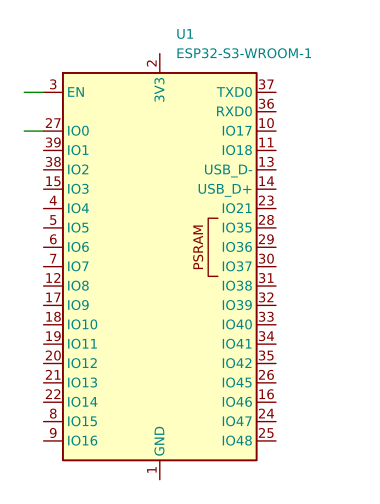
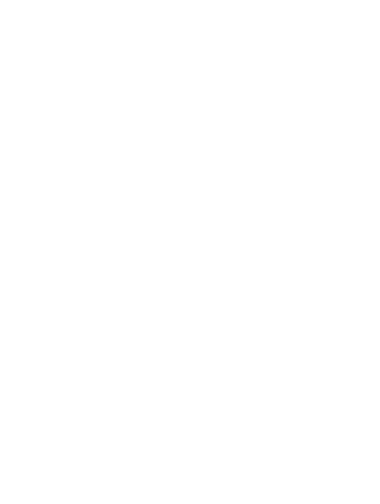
wire: (24, 92) (43, 92) -> none
wire: (24, 131) (43, 131) -> none
U1: ESP32-S3-WROOM-1 (159, 266) -> none

